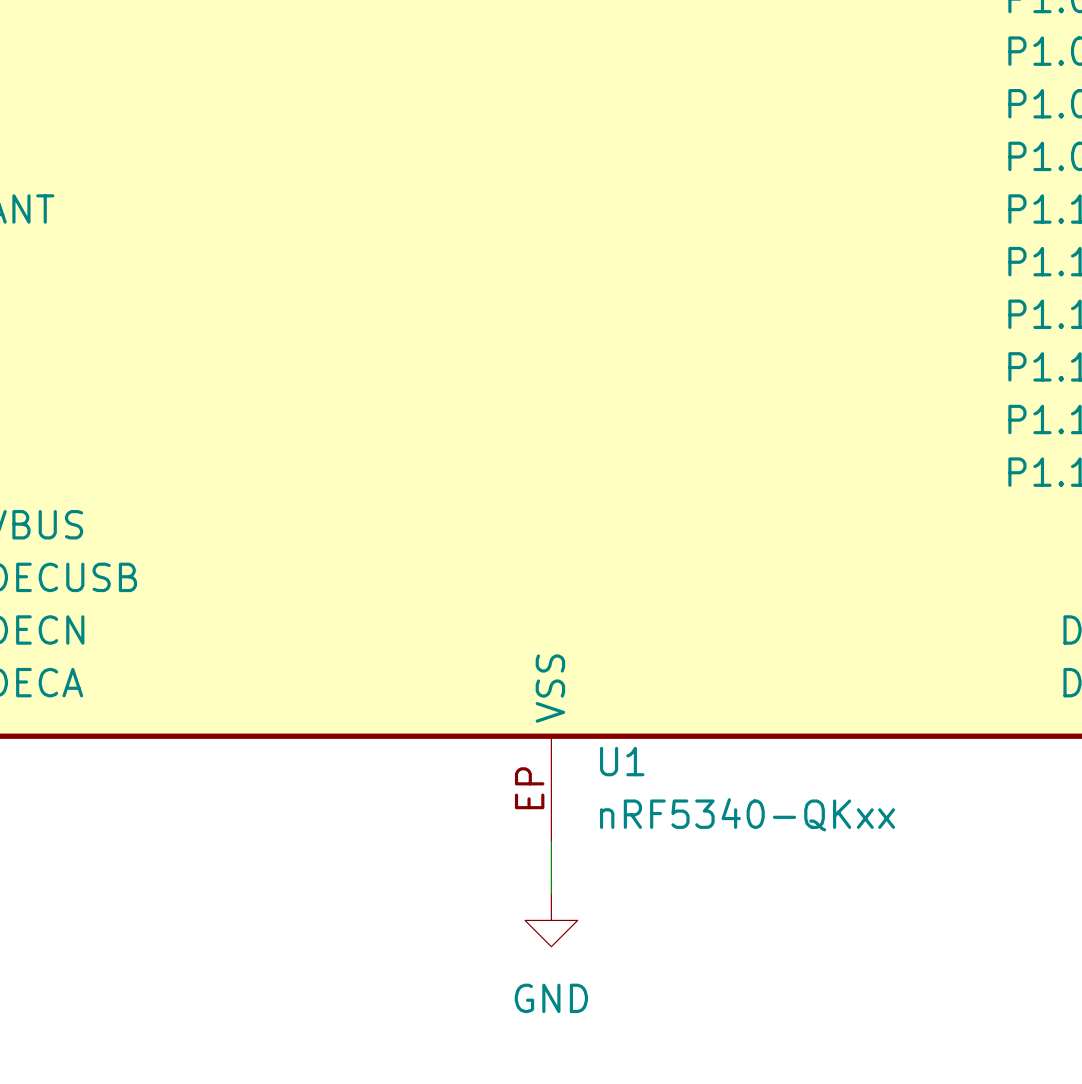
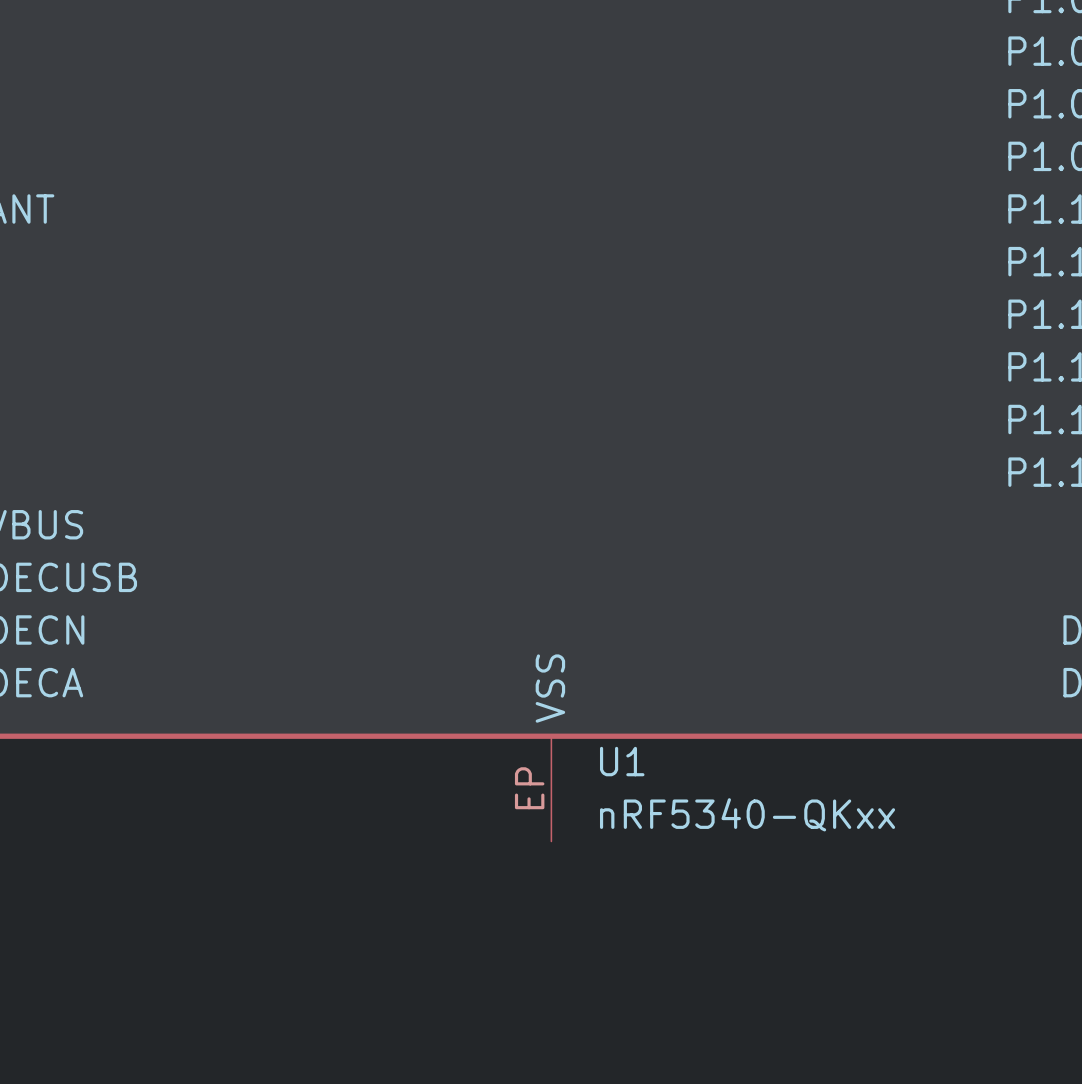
wire: (551, 841) (551, 894) -> none
power symbol: GND (551, 920) -> none

